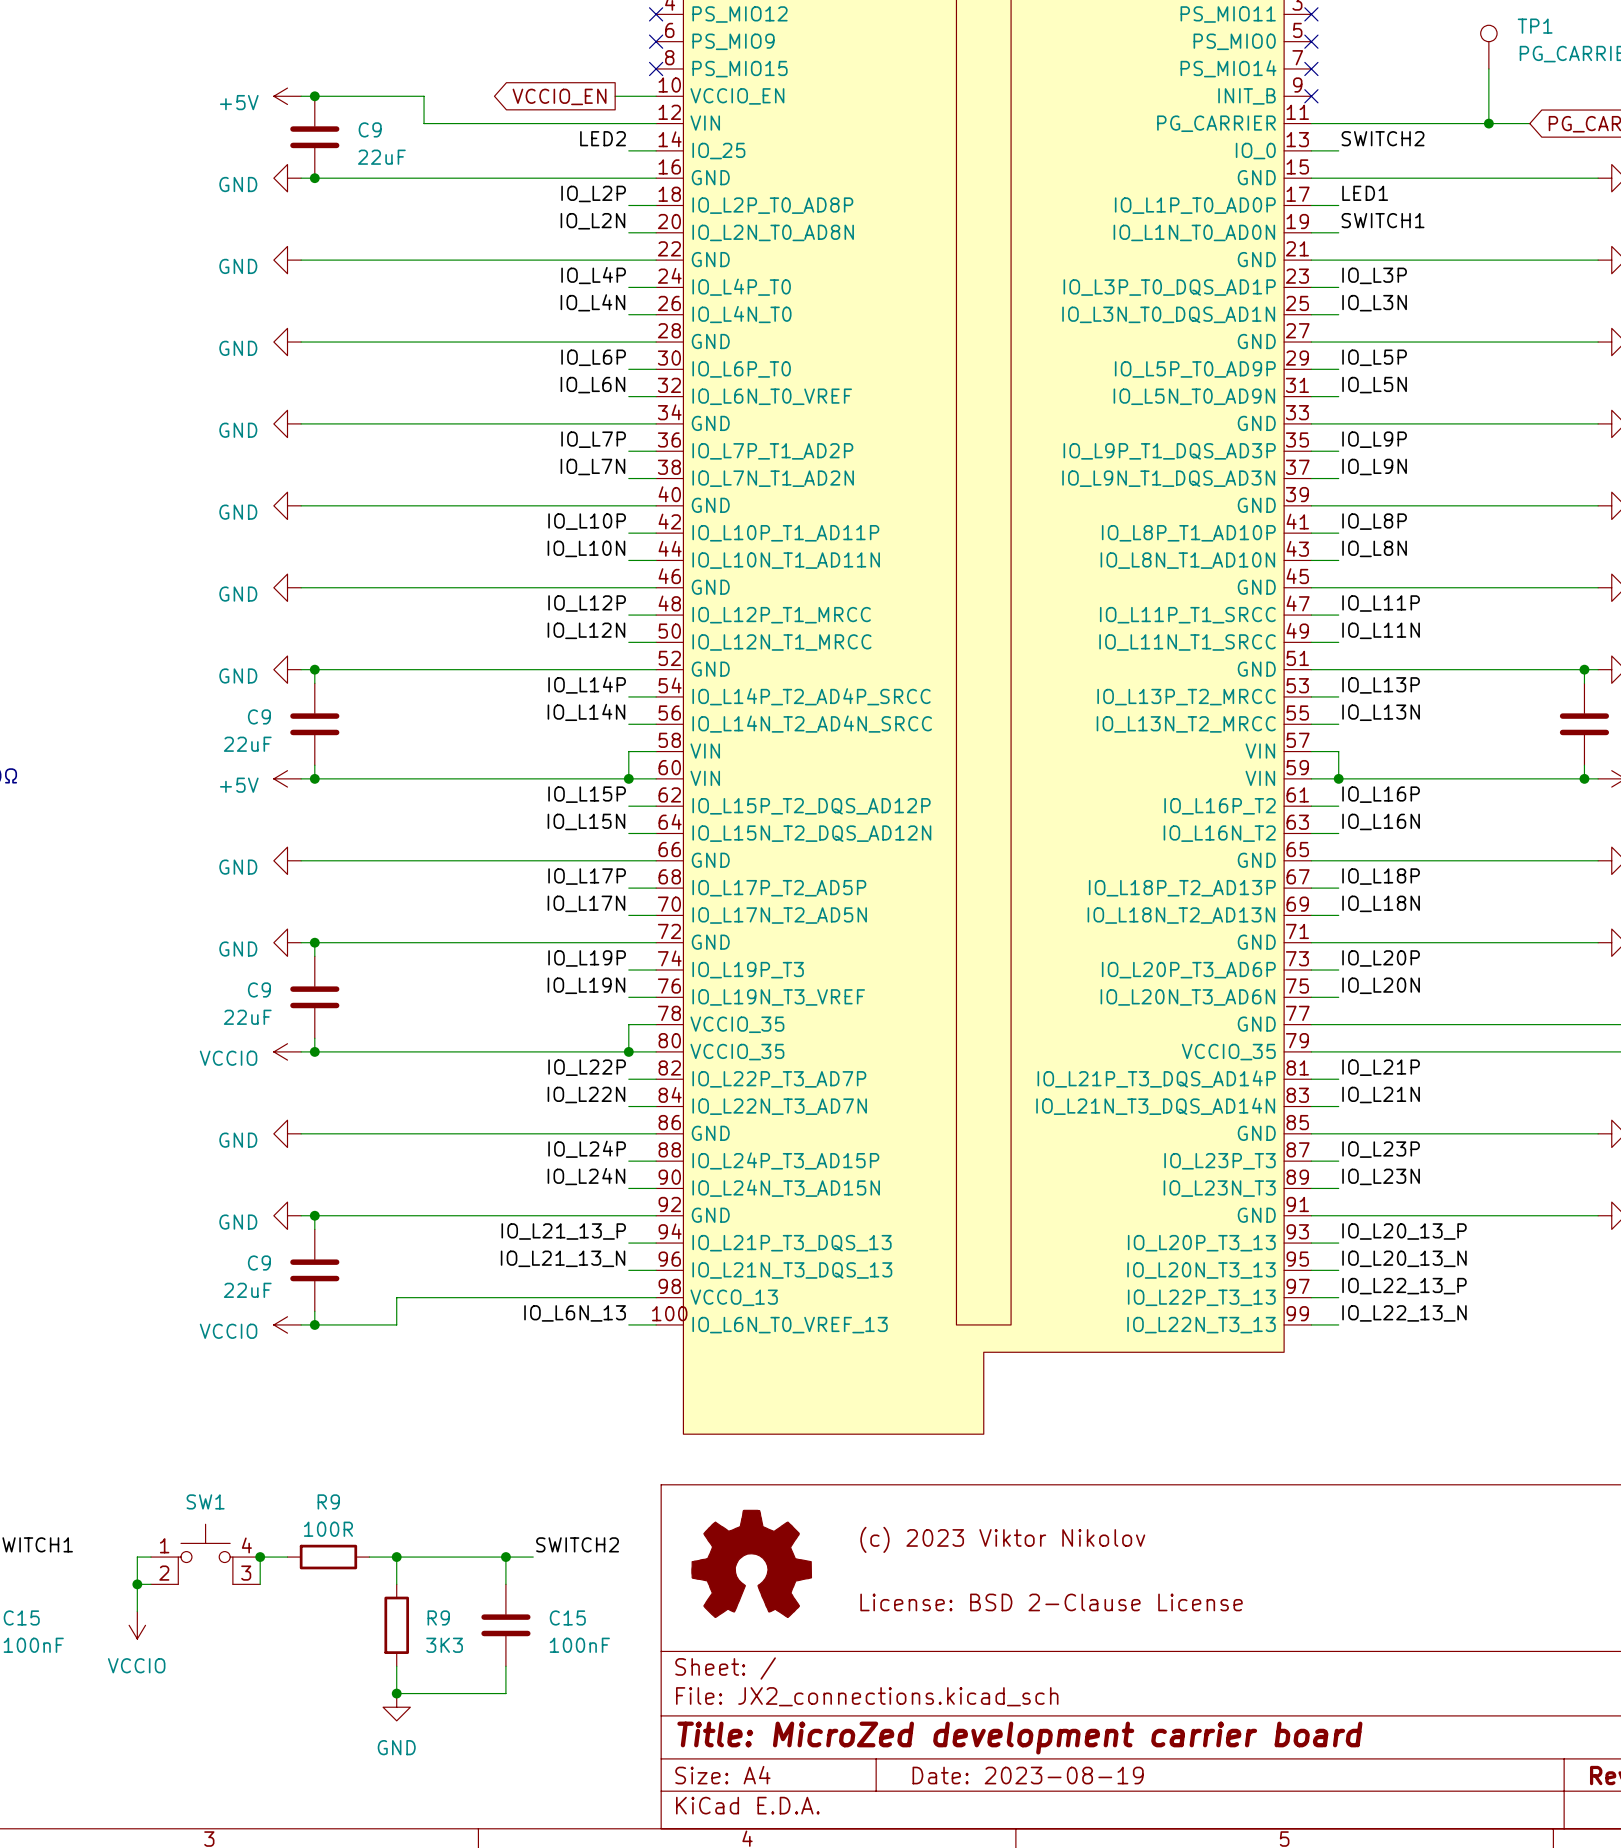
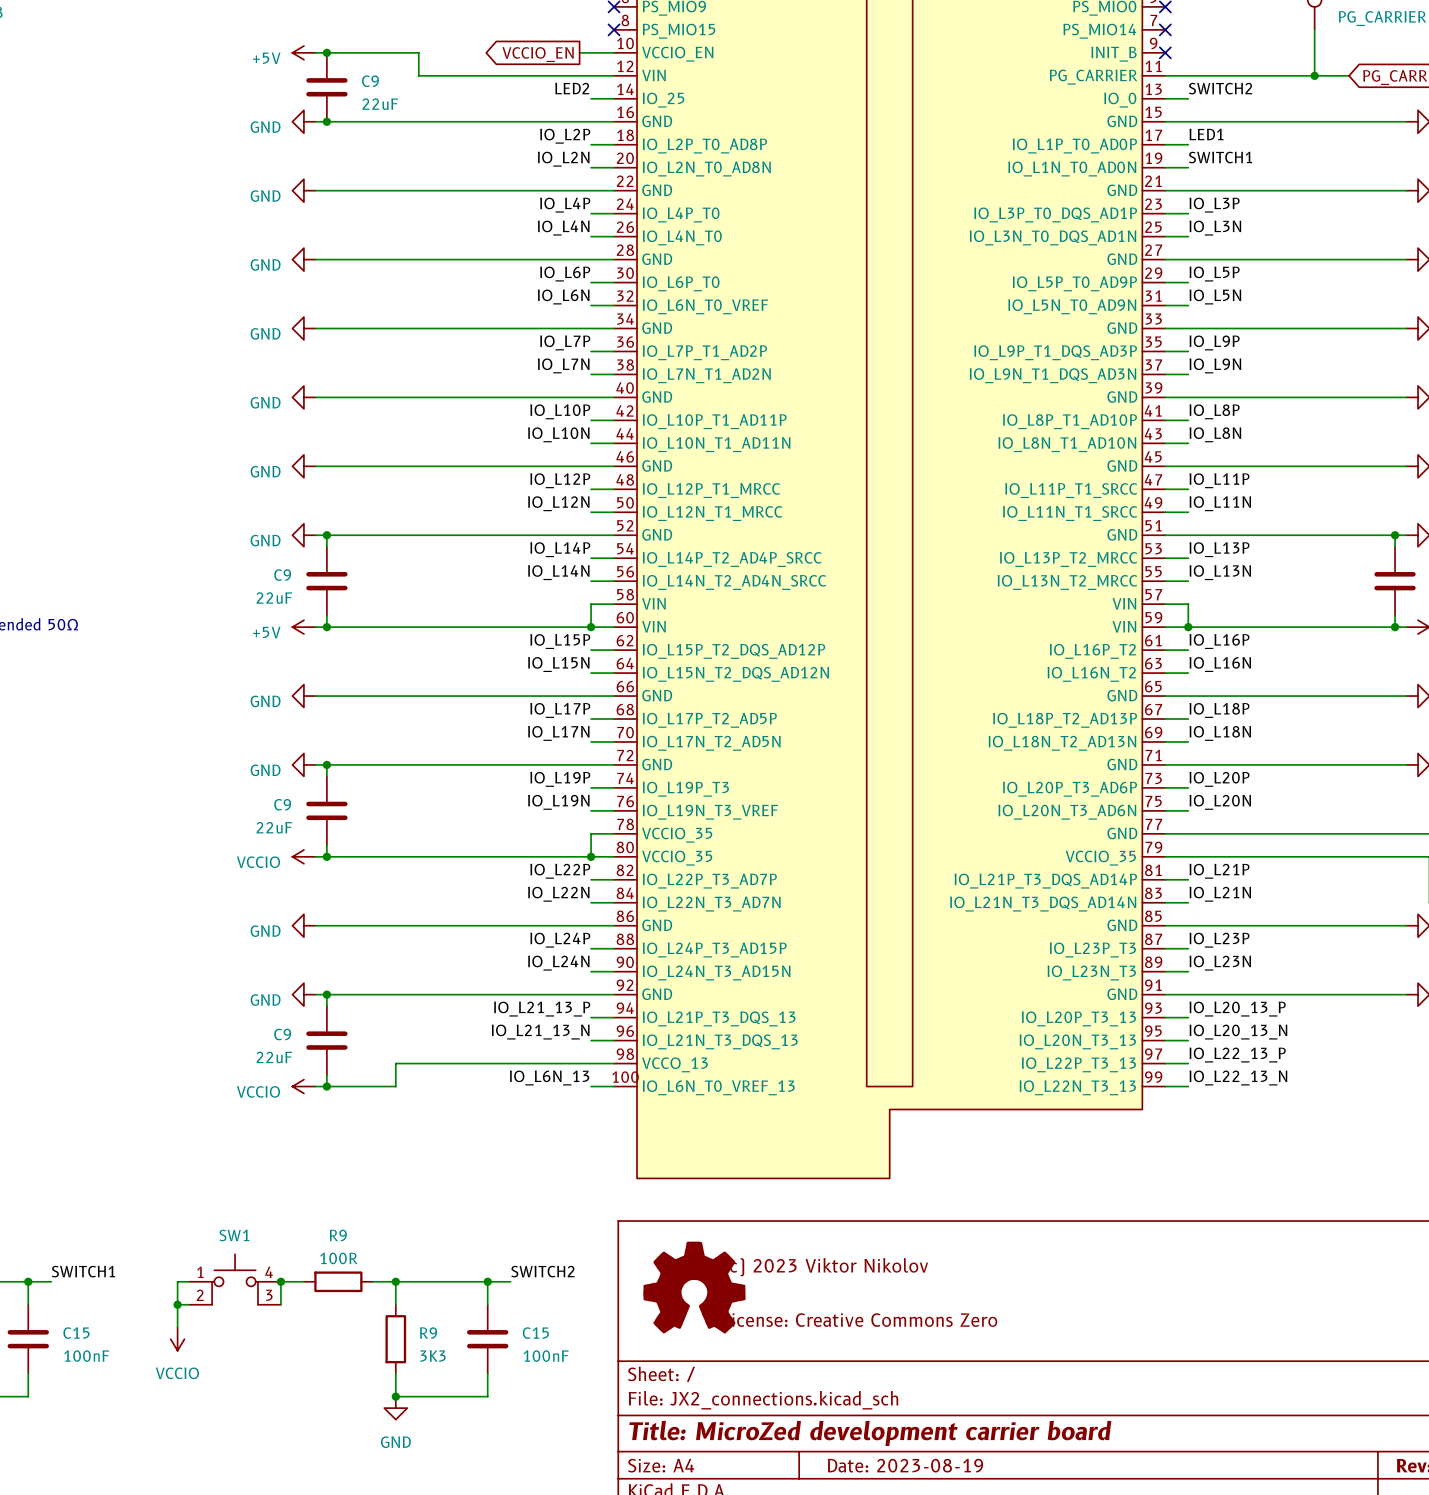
title block: License: BSD 2-Clause License (1051, 1602) -> License: Creative Commons Zero (859, 1320)

